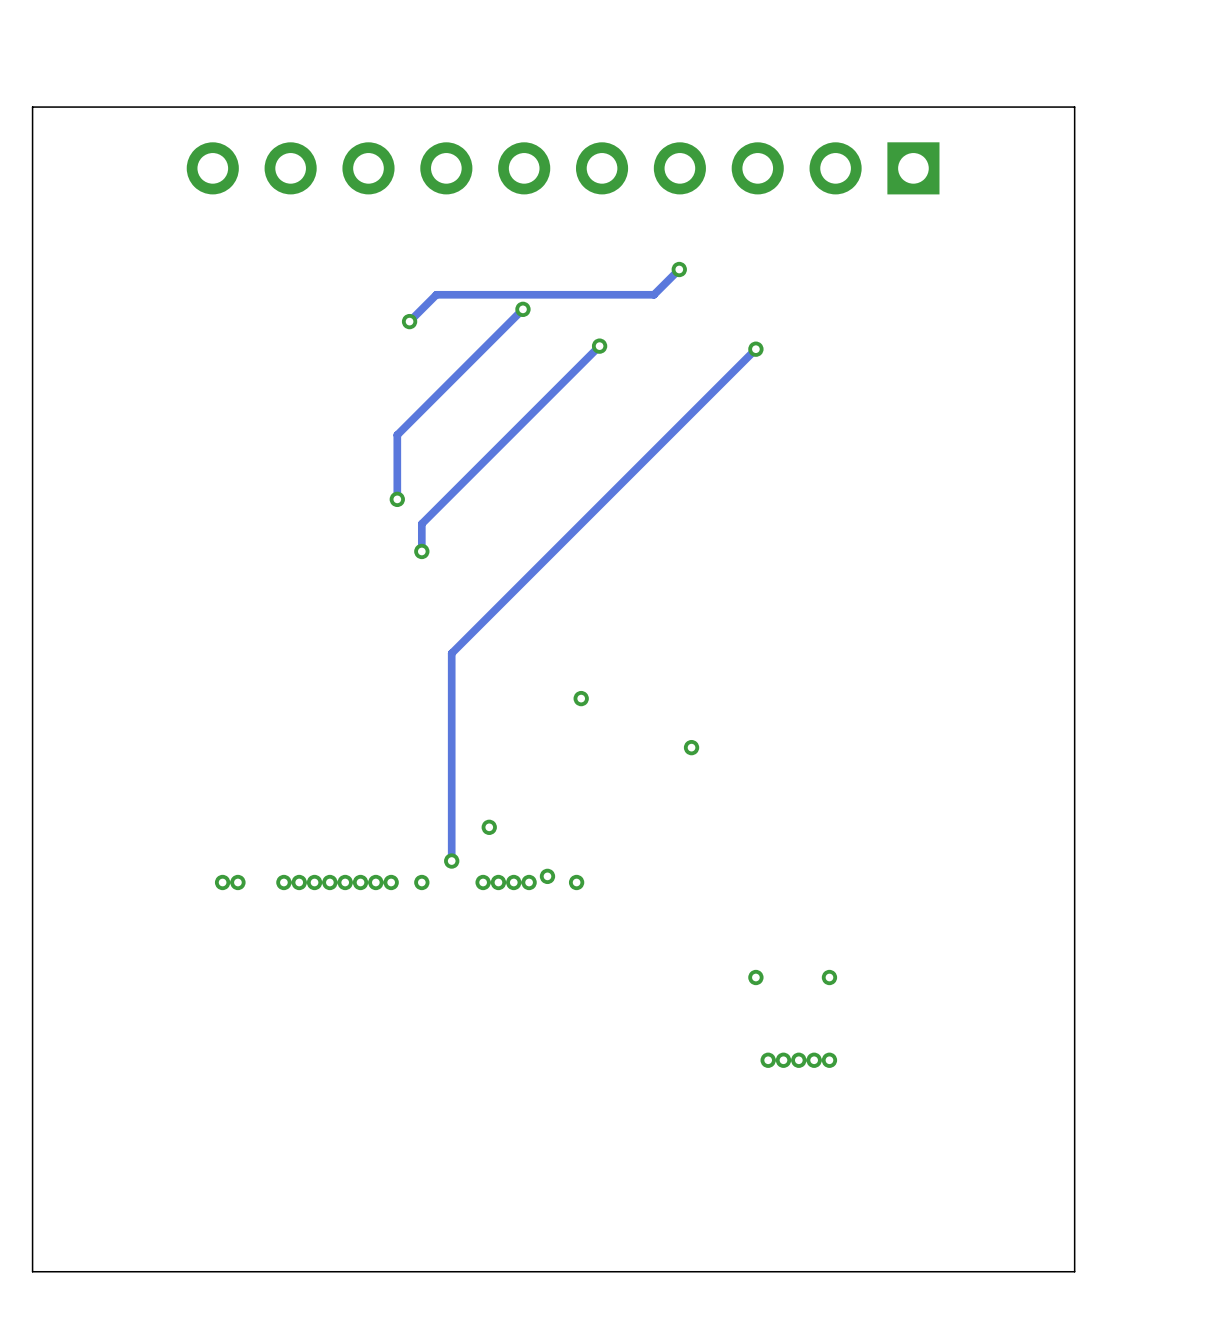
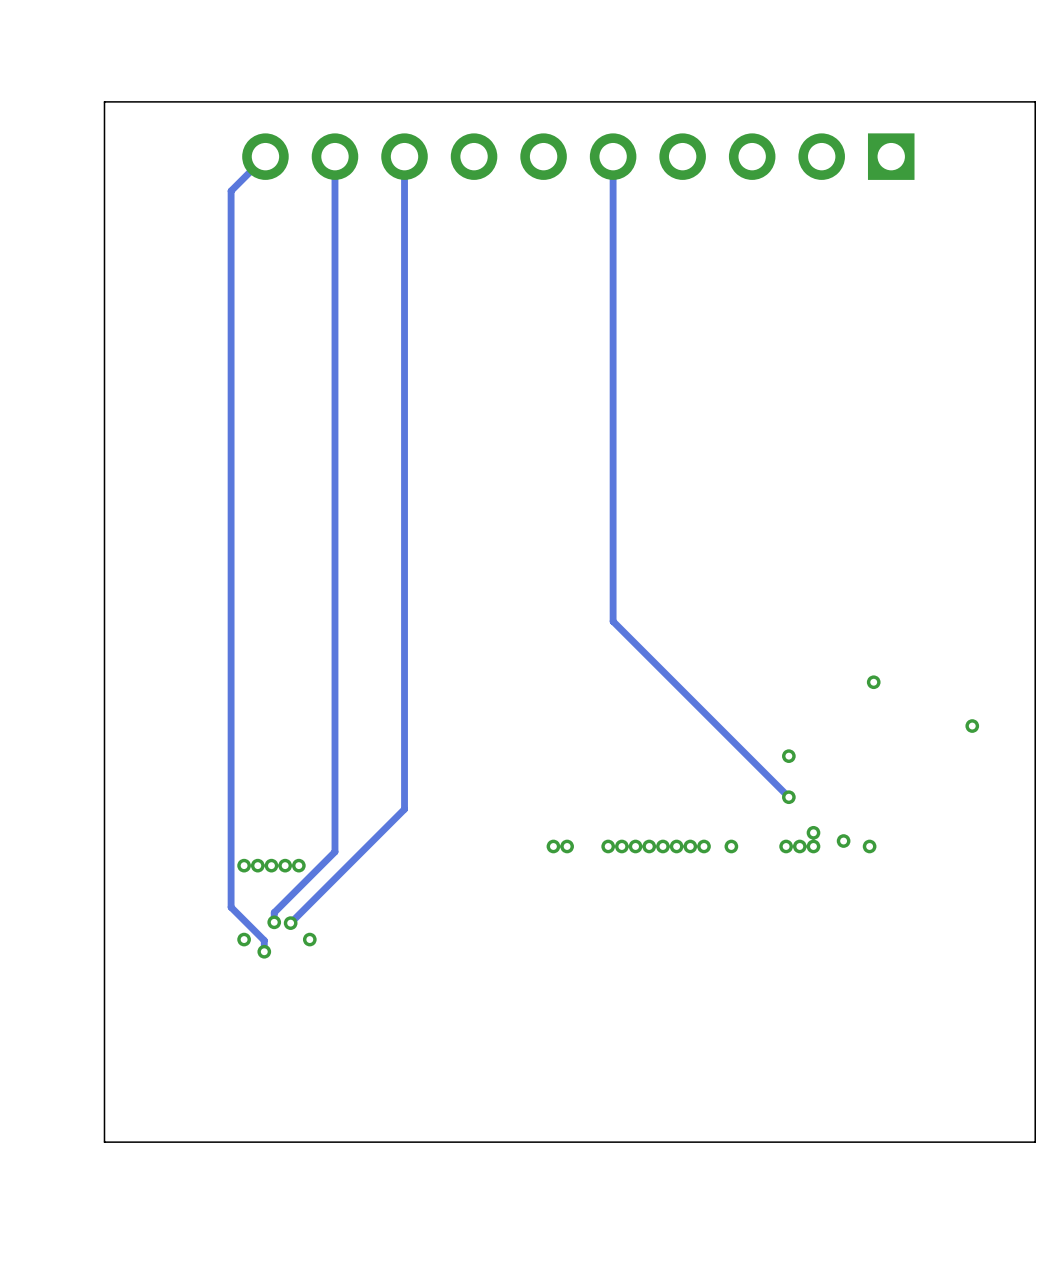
track: none -> (265, 156) (231, 191) (231, 907) (264, 940) (264, 951)
track: none -> (334, 156) (334, 851) (274, 912) (274, 922)
track: none -> (404, 156) (404, 809) (290, 923)
track: none -> (613, 156) (613, 621) (788, 797)
track: (679, 269) (653, 294) (436, 294) (409, 321) -> none
via: (679, 269) -> none
track: (522, 309) (397, 435) (397, 499) -> none
via: (522, 309) -> none
via: (409, 321) -> none
track: (599, 346) (421, 523) (421, 551) -> none
via: (599, 346) -> none
track: (755, 349) (451, 653) (451, 861) -> none
via: (755, 349) -> none
via: (397, 499) -> none
via: (421, 551) -> none
via: (581, 698) -> none
via: (691, 747) -> none
via: none -> (873, 682)
via: none -> (972, 726)
via: (489, 827) -> none
via: none -> (788, 756)
via: (451, 861) -> none
via: (547, 876) -> none
via: (222, 882) -> none
via: (237, 882) -> none
via: (283, 882) -> none
via: (299, 882) -> none
via: (314, 882) -> none
via: (329, 882) -> none
via: (345, 882) -> none
via: (360, 882) -> none
via: (375, 882) -> none
via: (391, 882) -> none
via: (421, 882) -> none
via: (483, 882) -> none
via: (498, 882) -> none
via: (513, 882) -> none
via: (529, 882) -> none
via: (576, 882) -> none
via: none -> (788, 797)
via: none -> (813, 832)
via: none -> (843, 841)
via: none -> (553, 846)
via: none -> (567, 846)
via: none -> (608, 846)
via: none -> (621, 846)
via: none -> (635, 846)
via: none -> (649, 846)
via: none -> (662, 846)
via: none -> (676, 846)
via: none -> (690, 846)
via: none -> (703, 846)
via: none -> (731, 846)
via: none -> (786, 846)
via: none -> (799, 846)
via: none -> (813, 846)
via: none -> (869, 846)
via: none -> (244, 865)
via: none -> (257, 865)
via: none -> (271, 865)
via: none -> (285, 865)
via: none -> (298, 865)
via: (755, 977) -> none
via: (829, 977) -> none
via: none -> (274, 922)
via: none -> (290, 923)
via: none -> (244, 939)
via: none -> (309, 939)
via: none -> (264, 951)
via: (768, 1060) -> none
via: (783, 1060) -> none
via: (798, 1060) -> none
via: (814, 1060) -> none
via: (829, 1060) -> none

